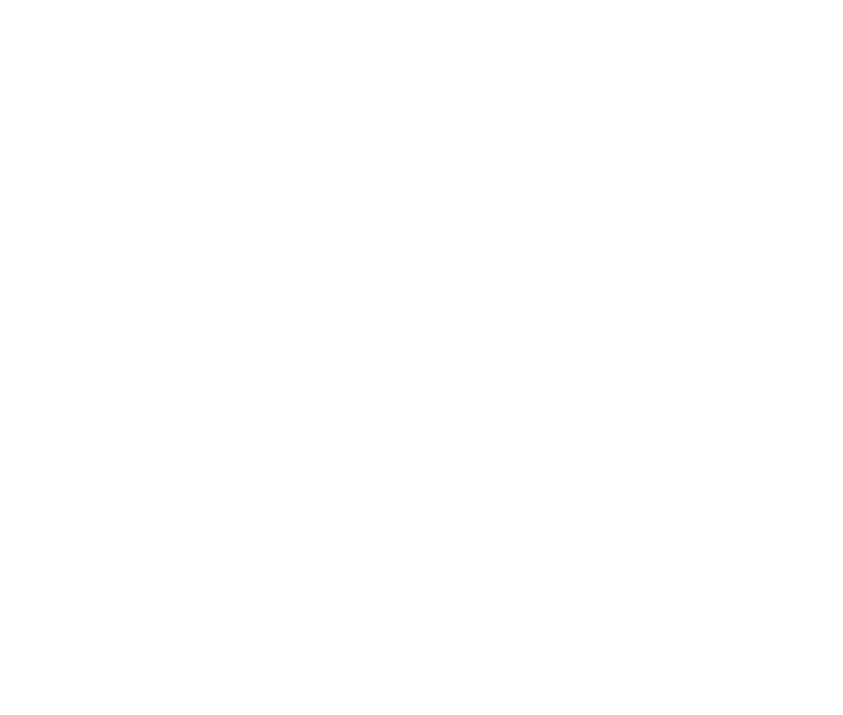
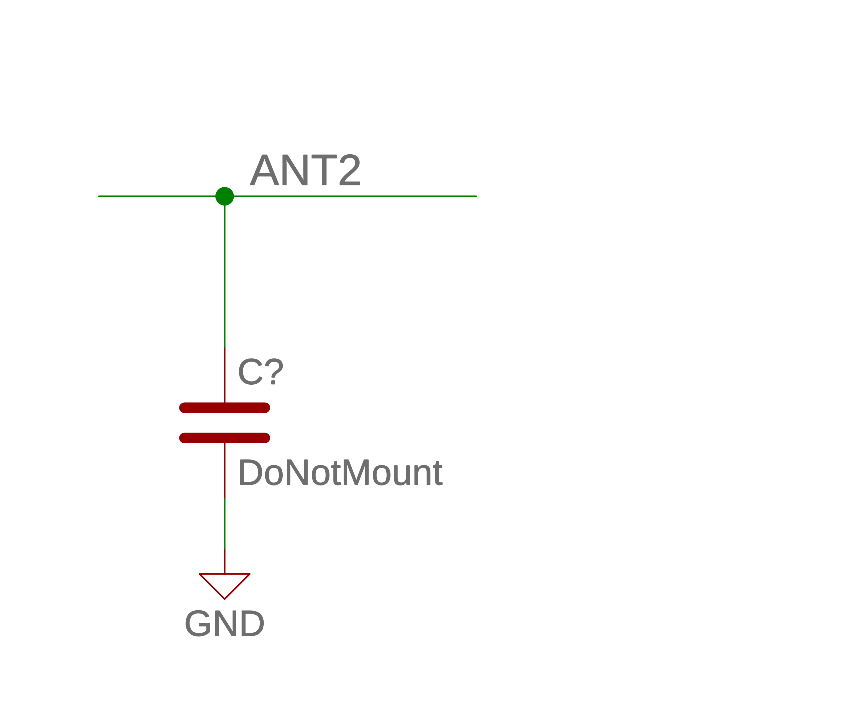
label: none -> ANT2 (304, 169)
wire: none -> (98, 196) (476, 196)
wire: none -> (224, 196) (224, 347)
junction: none -> (224, 196)
C?: none -> DoNotMount (224, 422)
wire: none -> (224, 498) (224, 548)
power symbol: none -> GND (224, 573)

